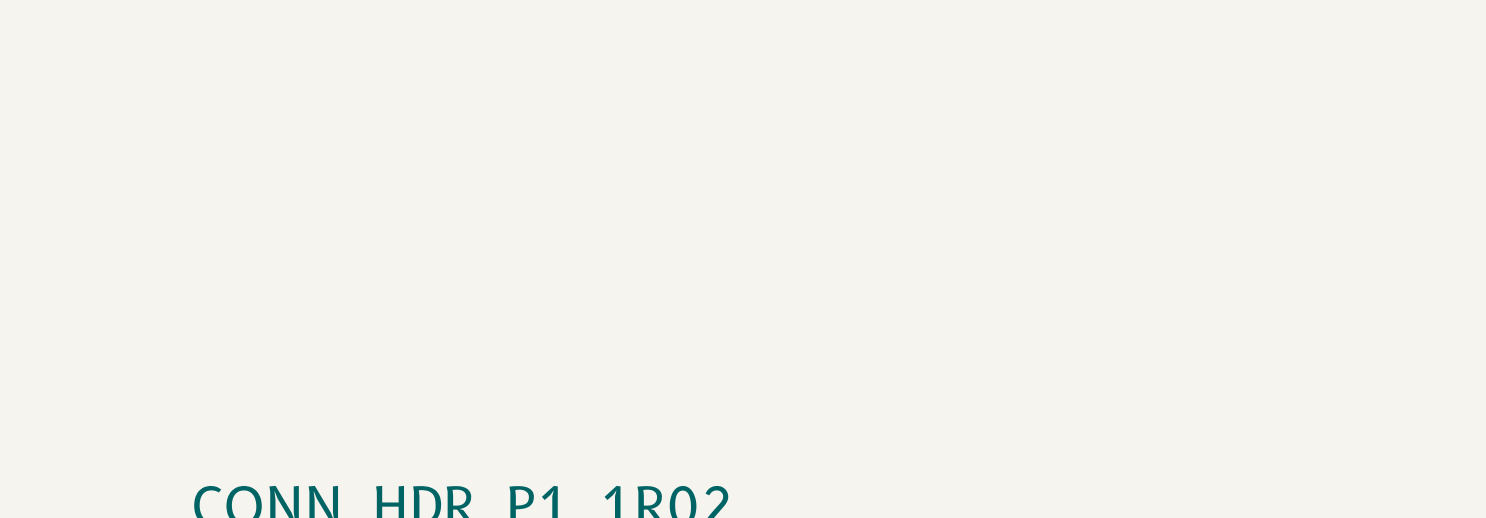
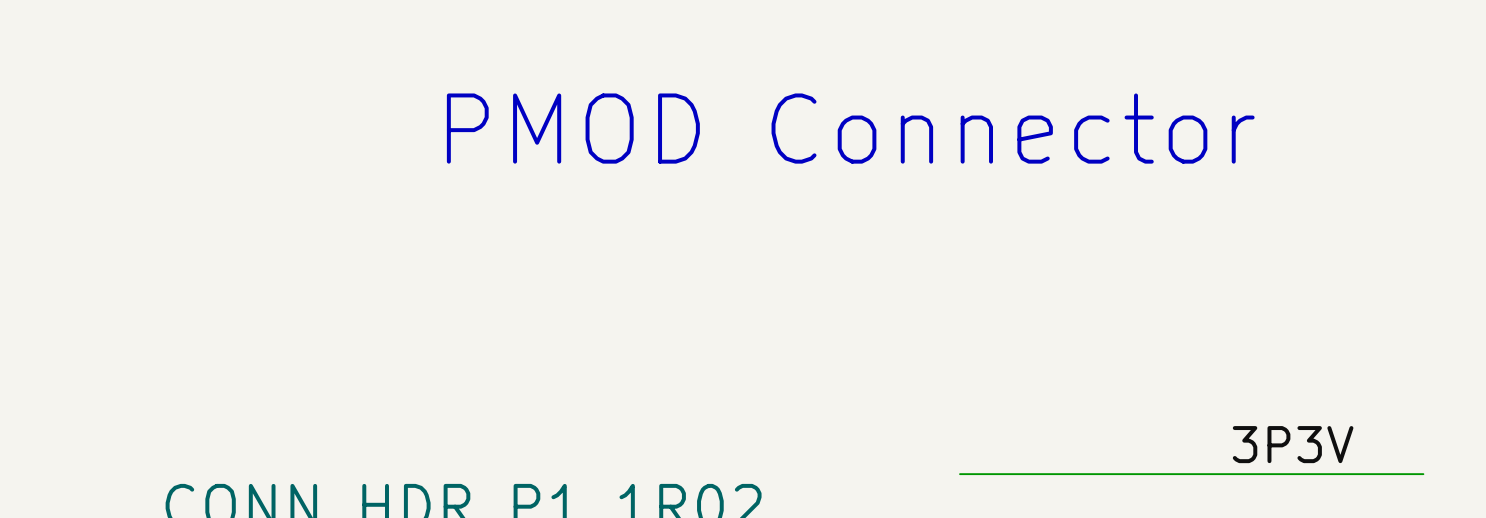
text: none -> PMOD Connector (850, 128)
label: none -> 3P3V (1293, 444)
wire: none -> (960, 474) (1423, 474)

